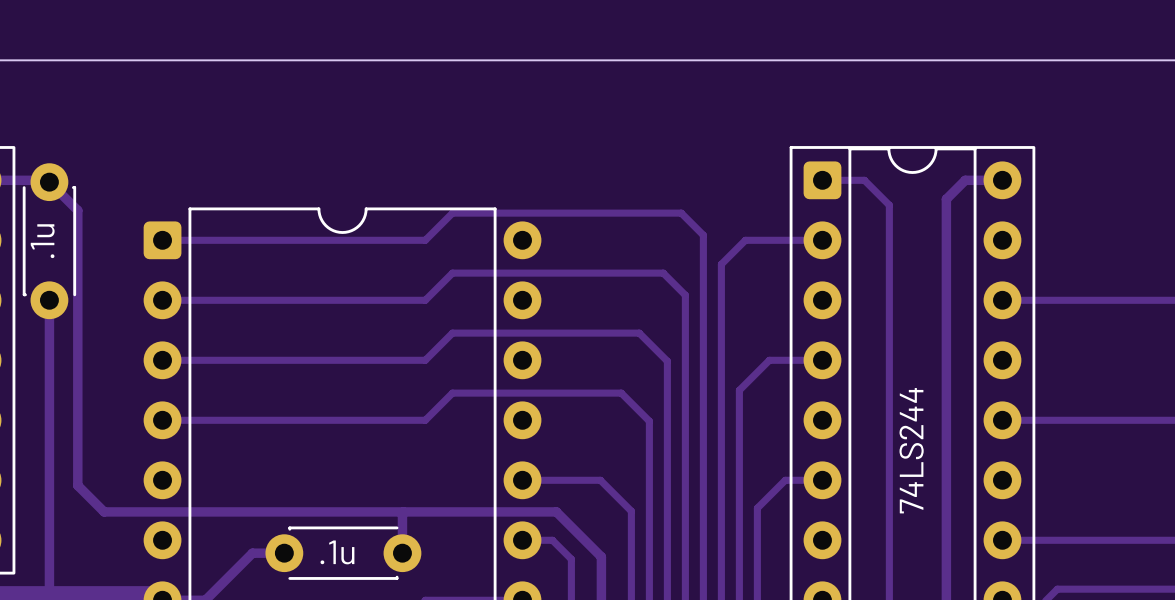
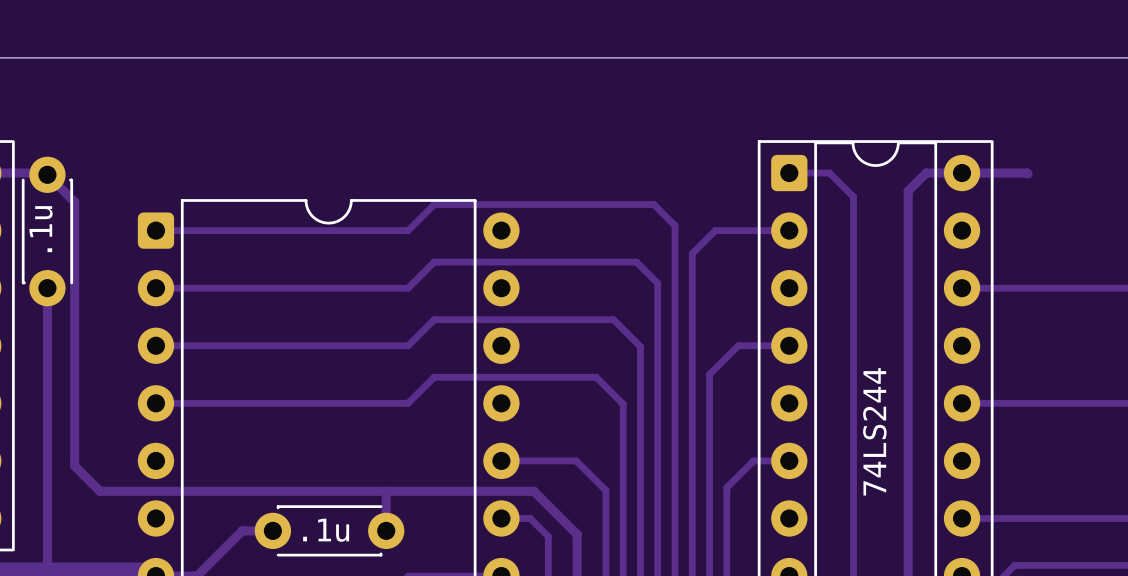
track: none -> (962, 173) (1028, 173)

